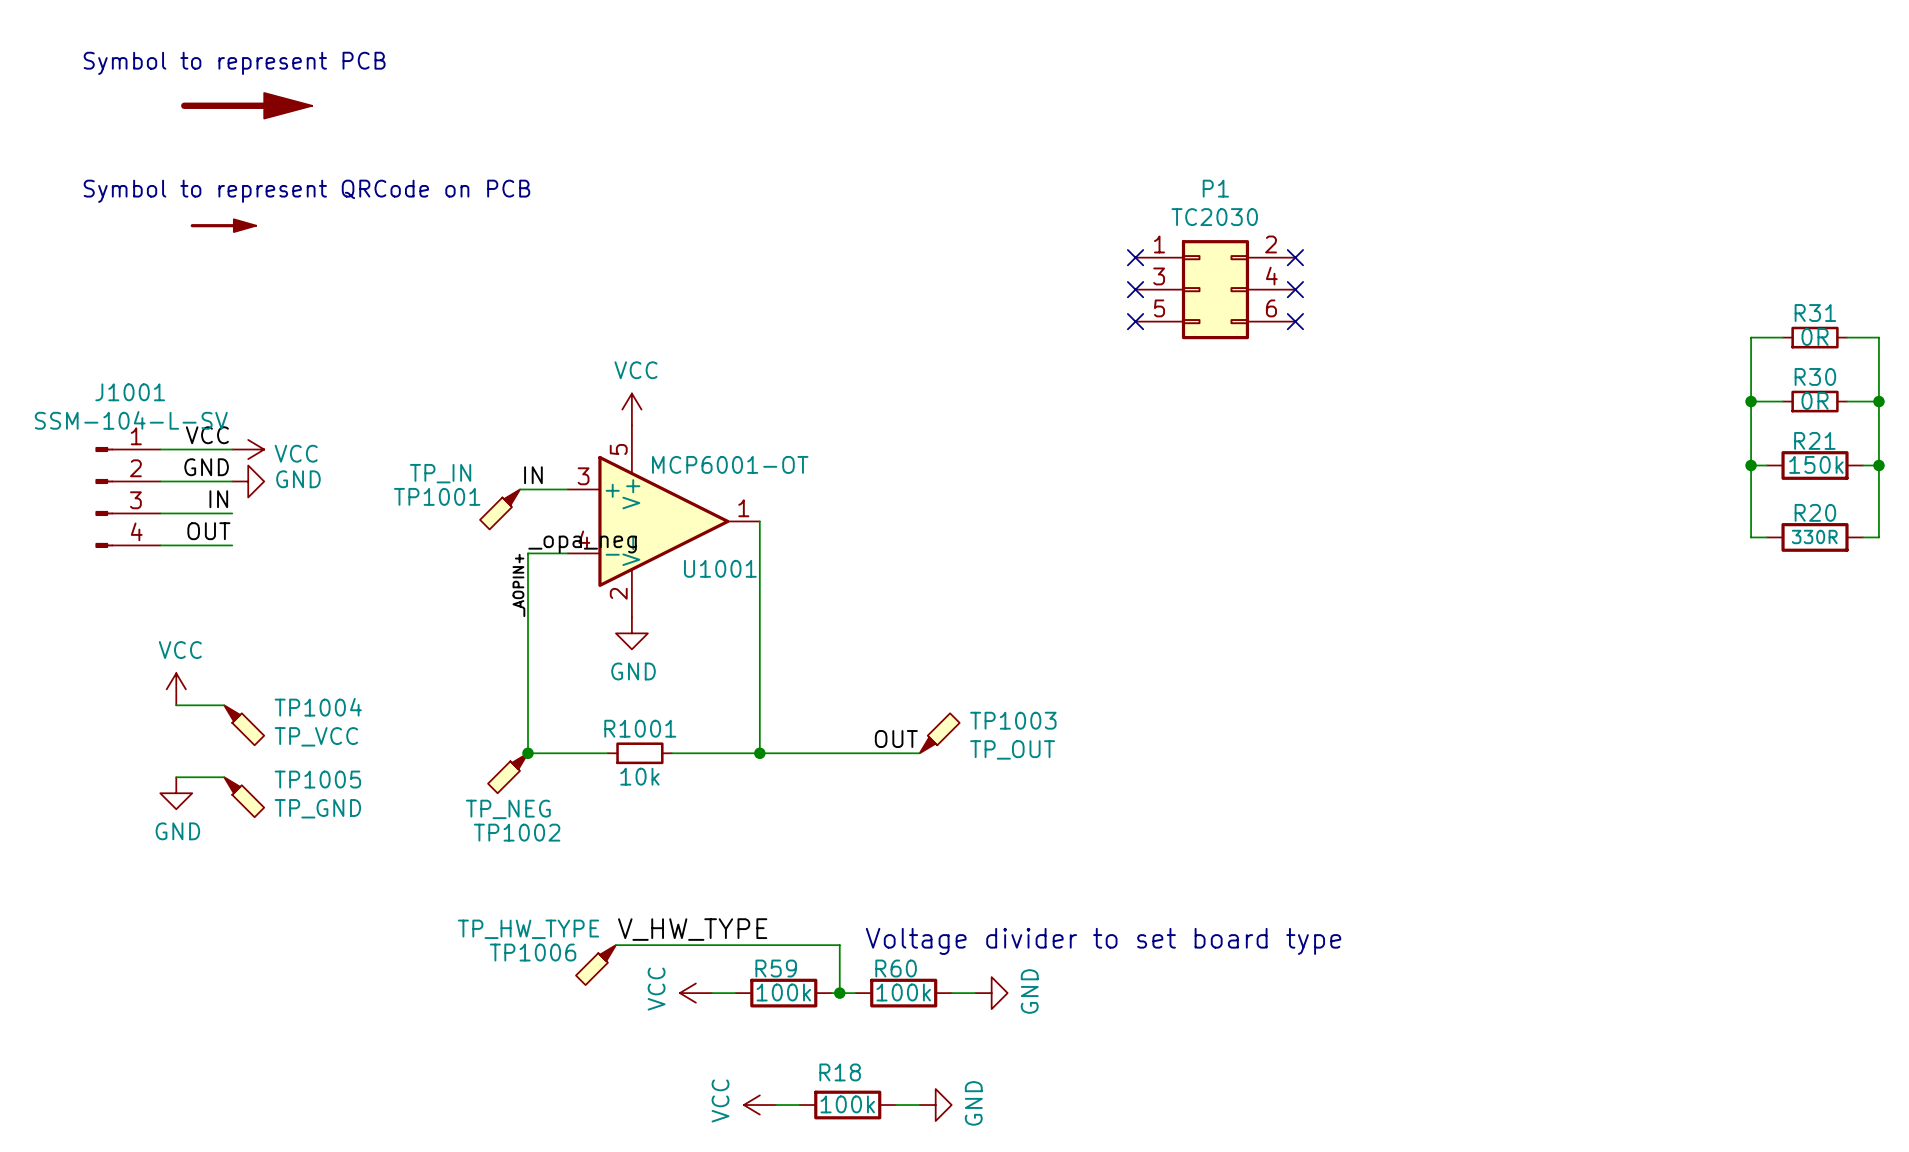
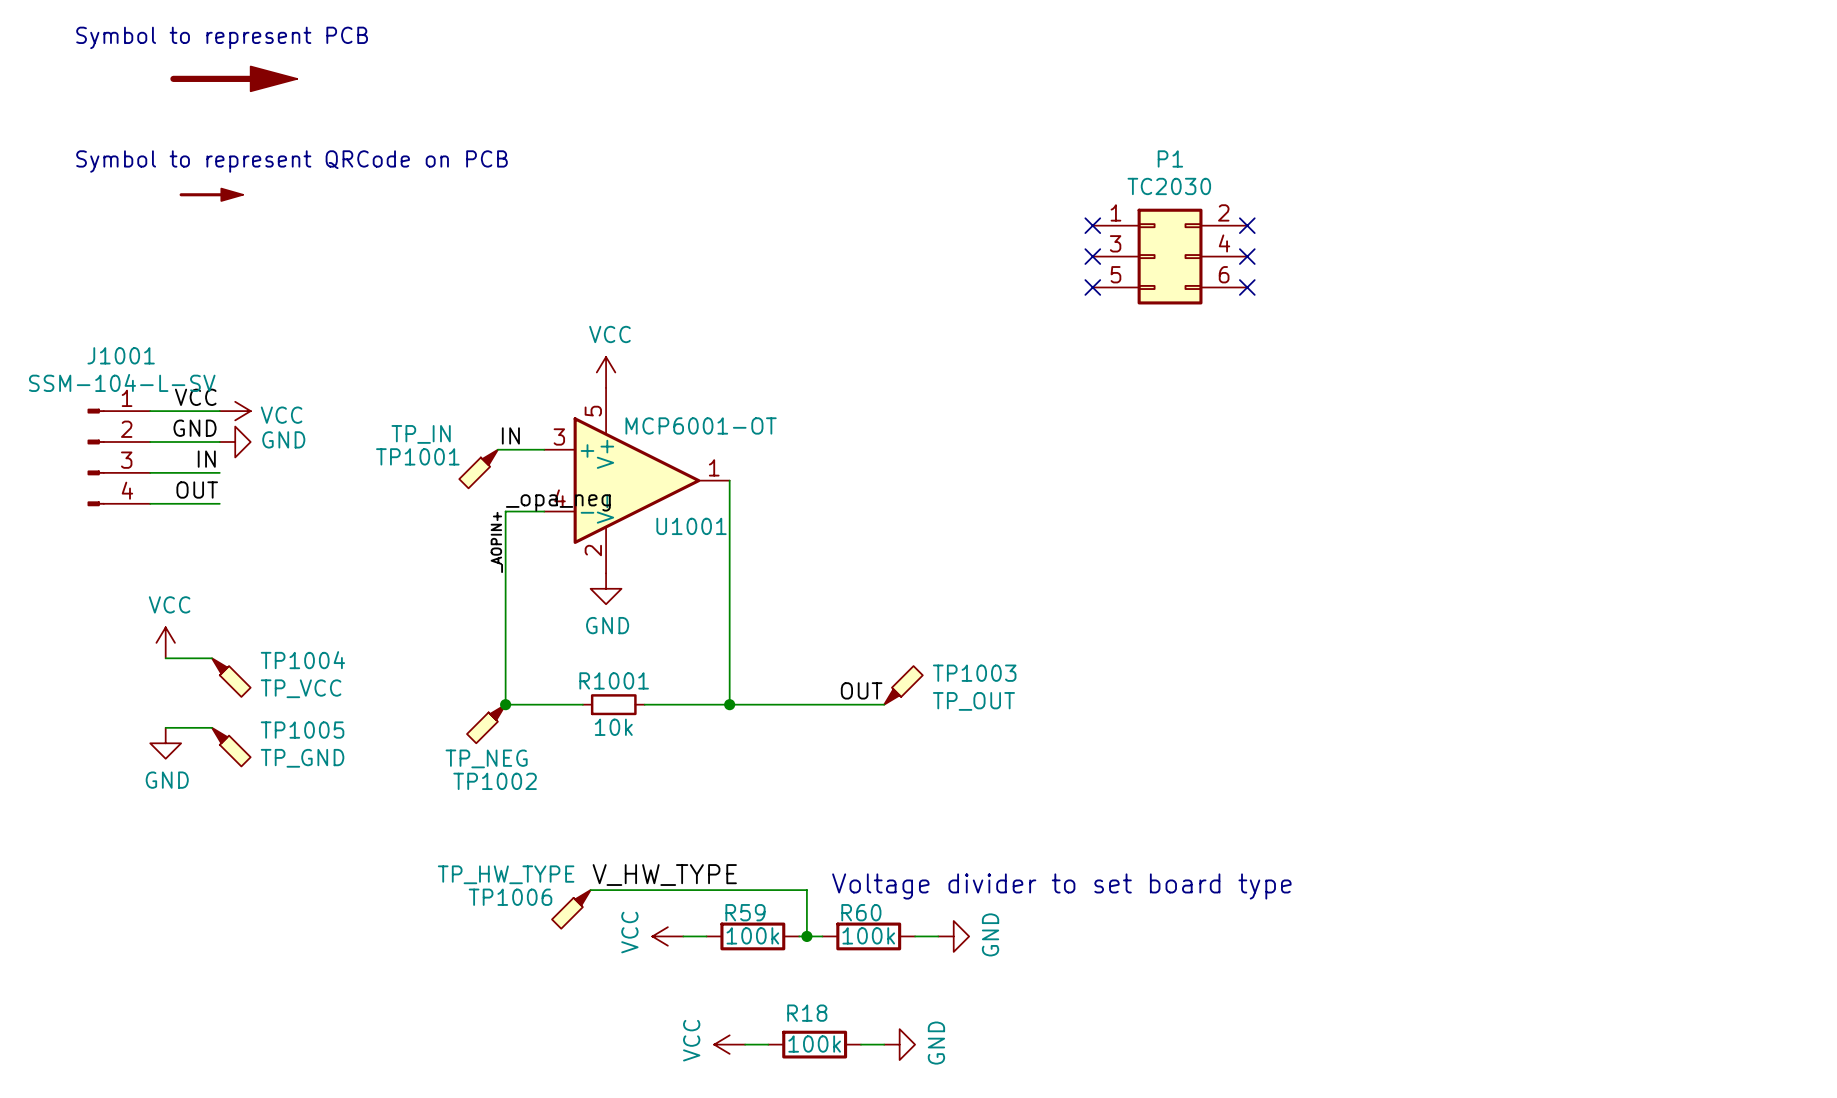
wire: (1783, 337) (1751, 337) (1751, 537) (1767, 537) -> none
R31: 0R (1815, 337) -> none
wire: (1846, 337) (1878, 337) (1878, 537) (1862, 537) -> none
wire: (1751, 401) (1783, 401) -> none
junction: (1751, 401) -> none
R30: 0R (1815, 401) -> none
wire: (1846, 401) (1878, 401) -> none
junction: (1878, 401) -> none
wire: (1751, 465) (1767, 465) -> none
junction: (1751, 465) -> none
R21: 150k (1815, 465) -> none
wire: (1862, 465) (1878, 465) -> none
junction: (1878, 465) -> none
R20: 330R (1815, 537) -> none

